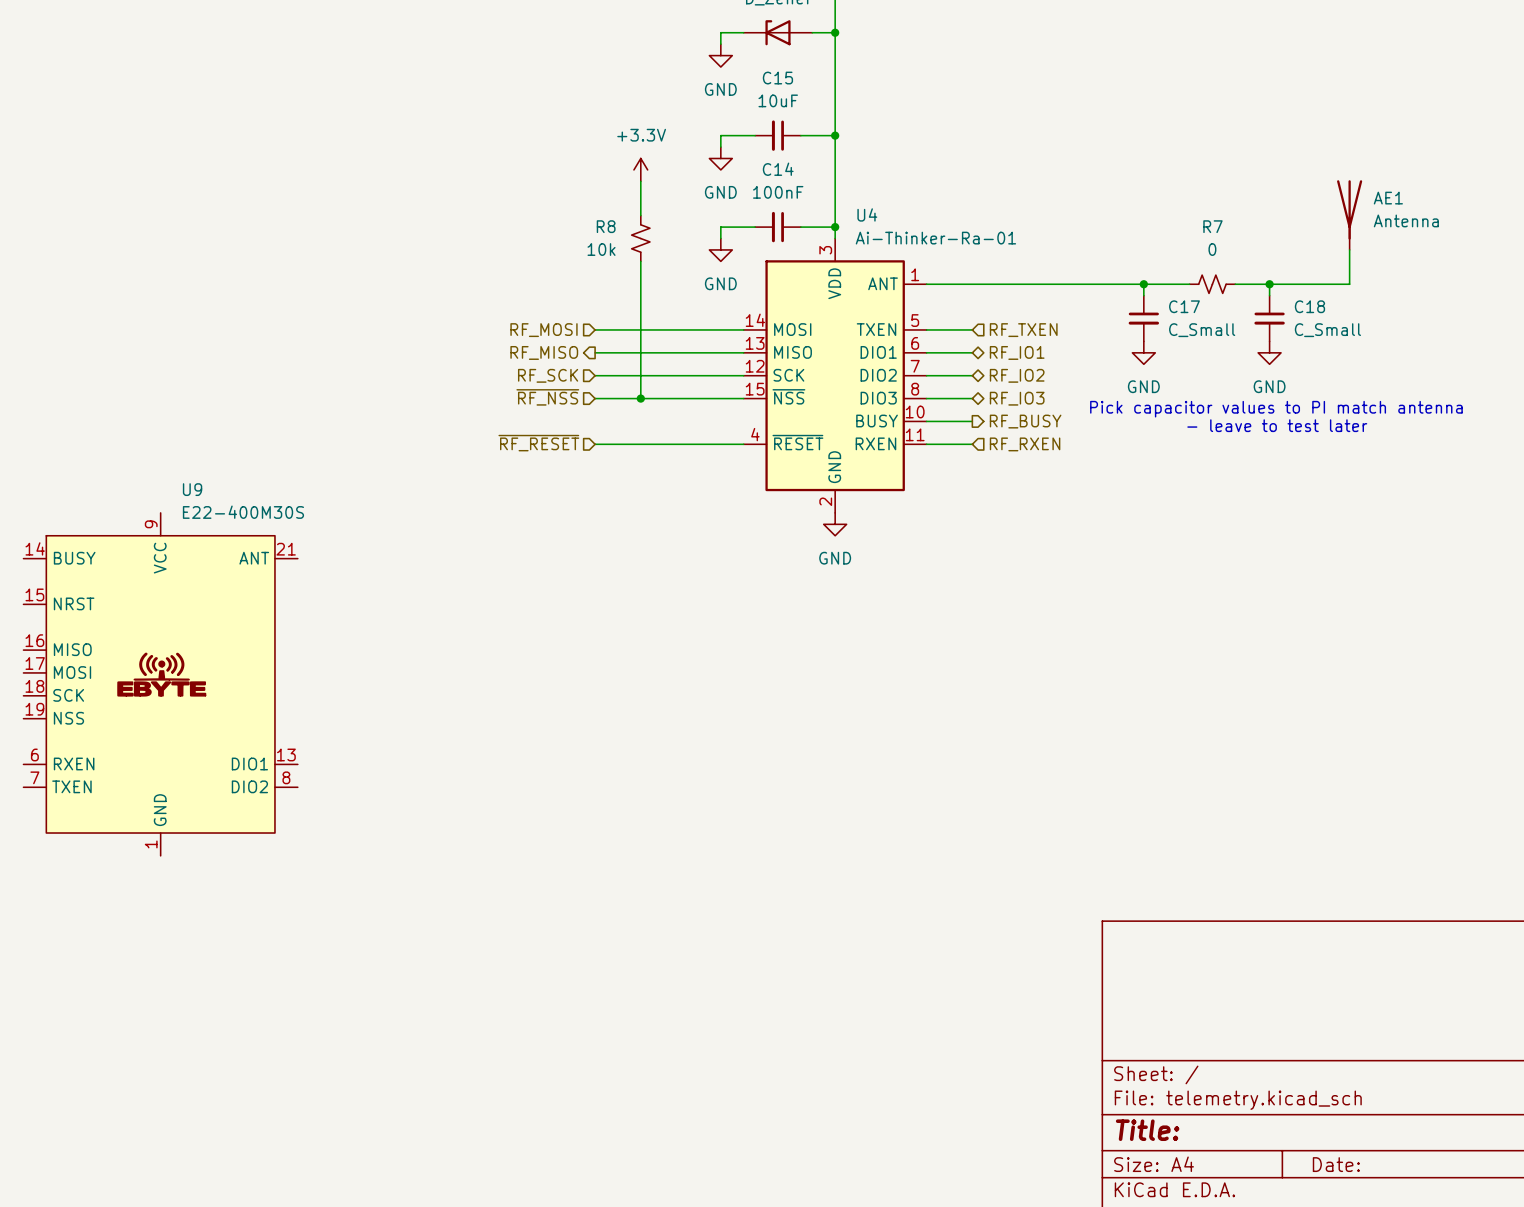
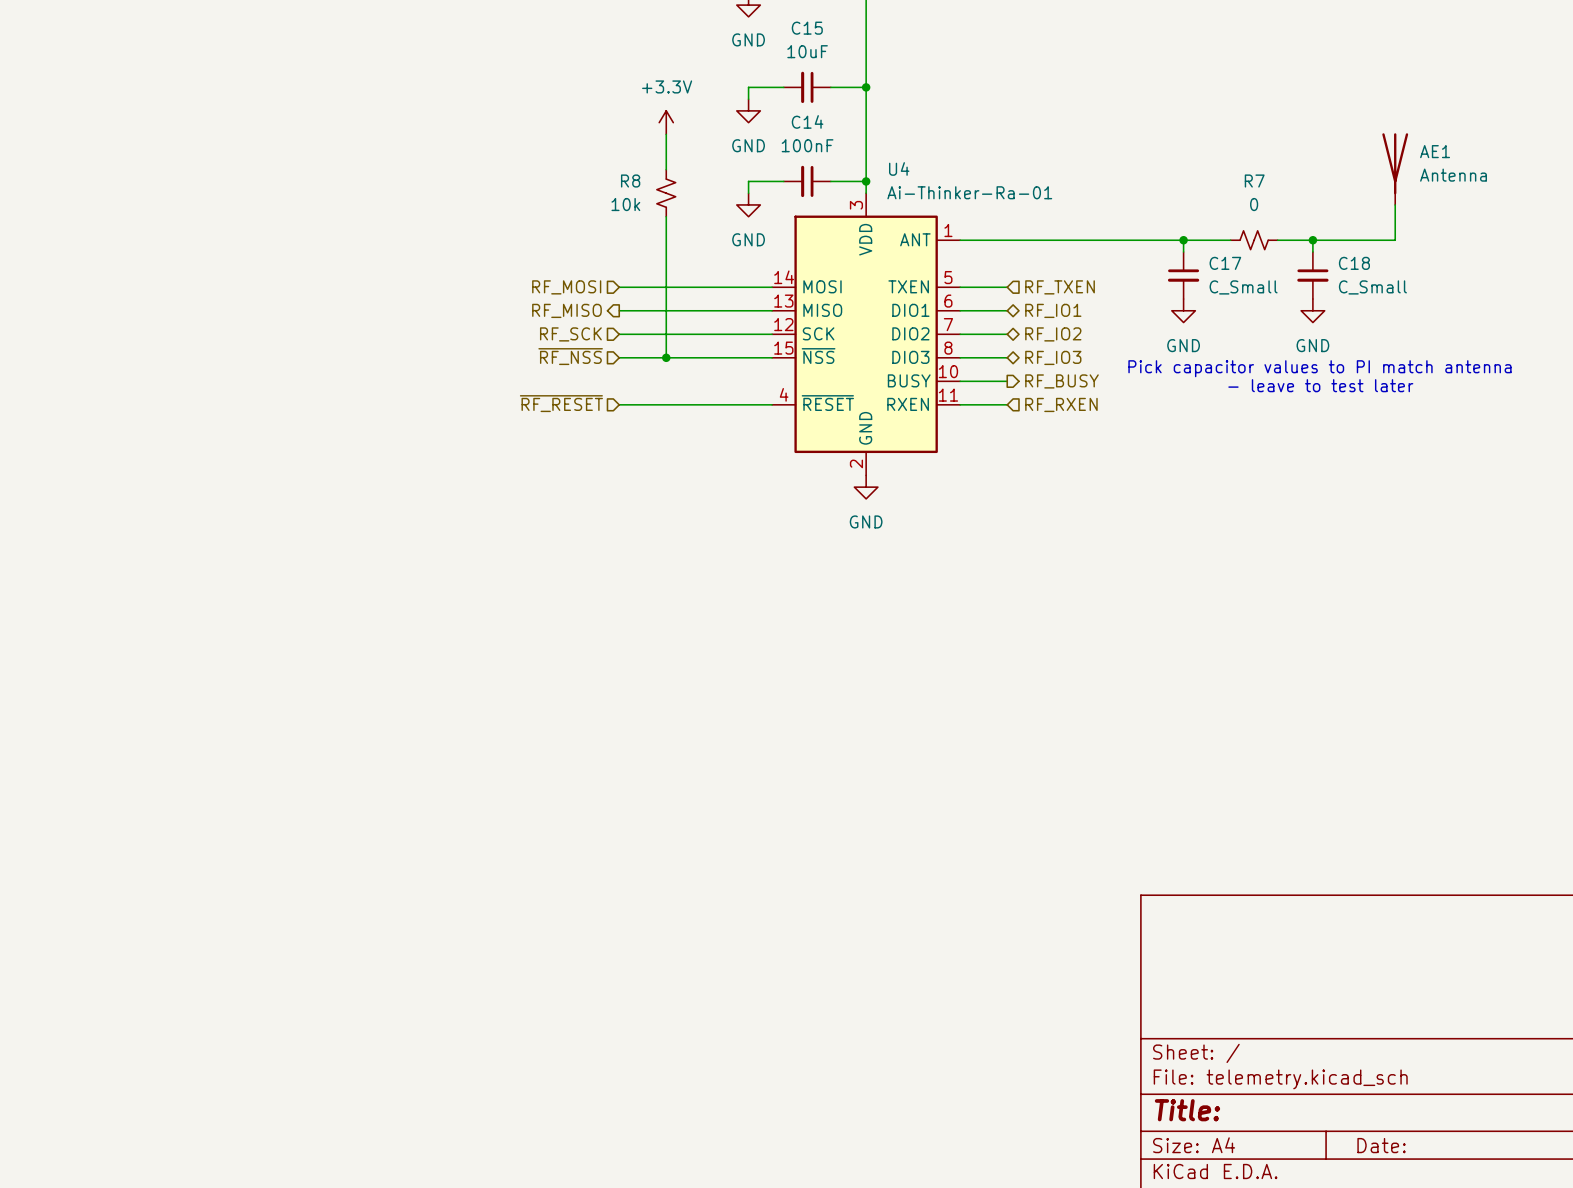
U9: E22-400M30S (160, 684) -> none

